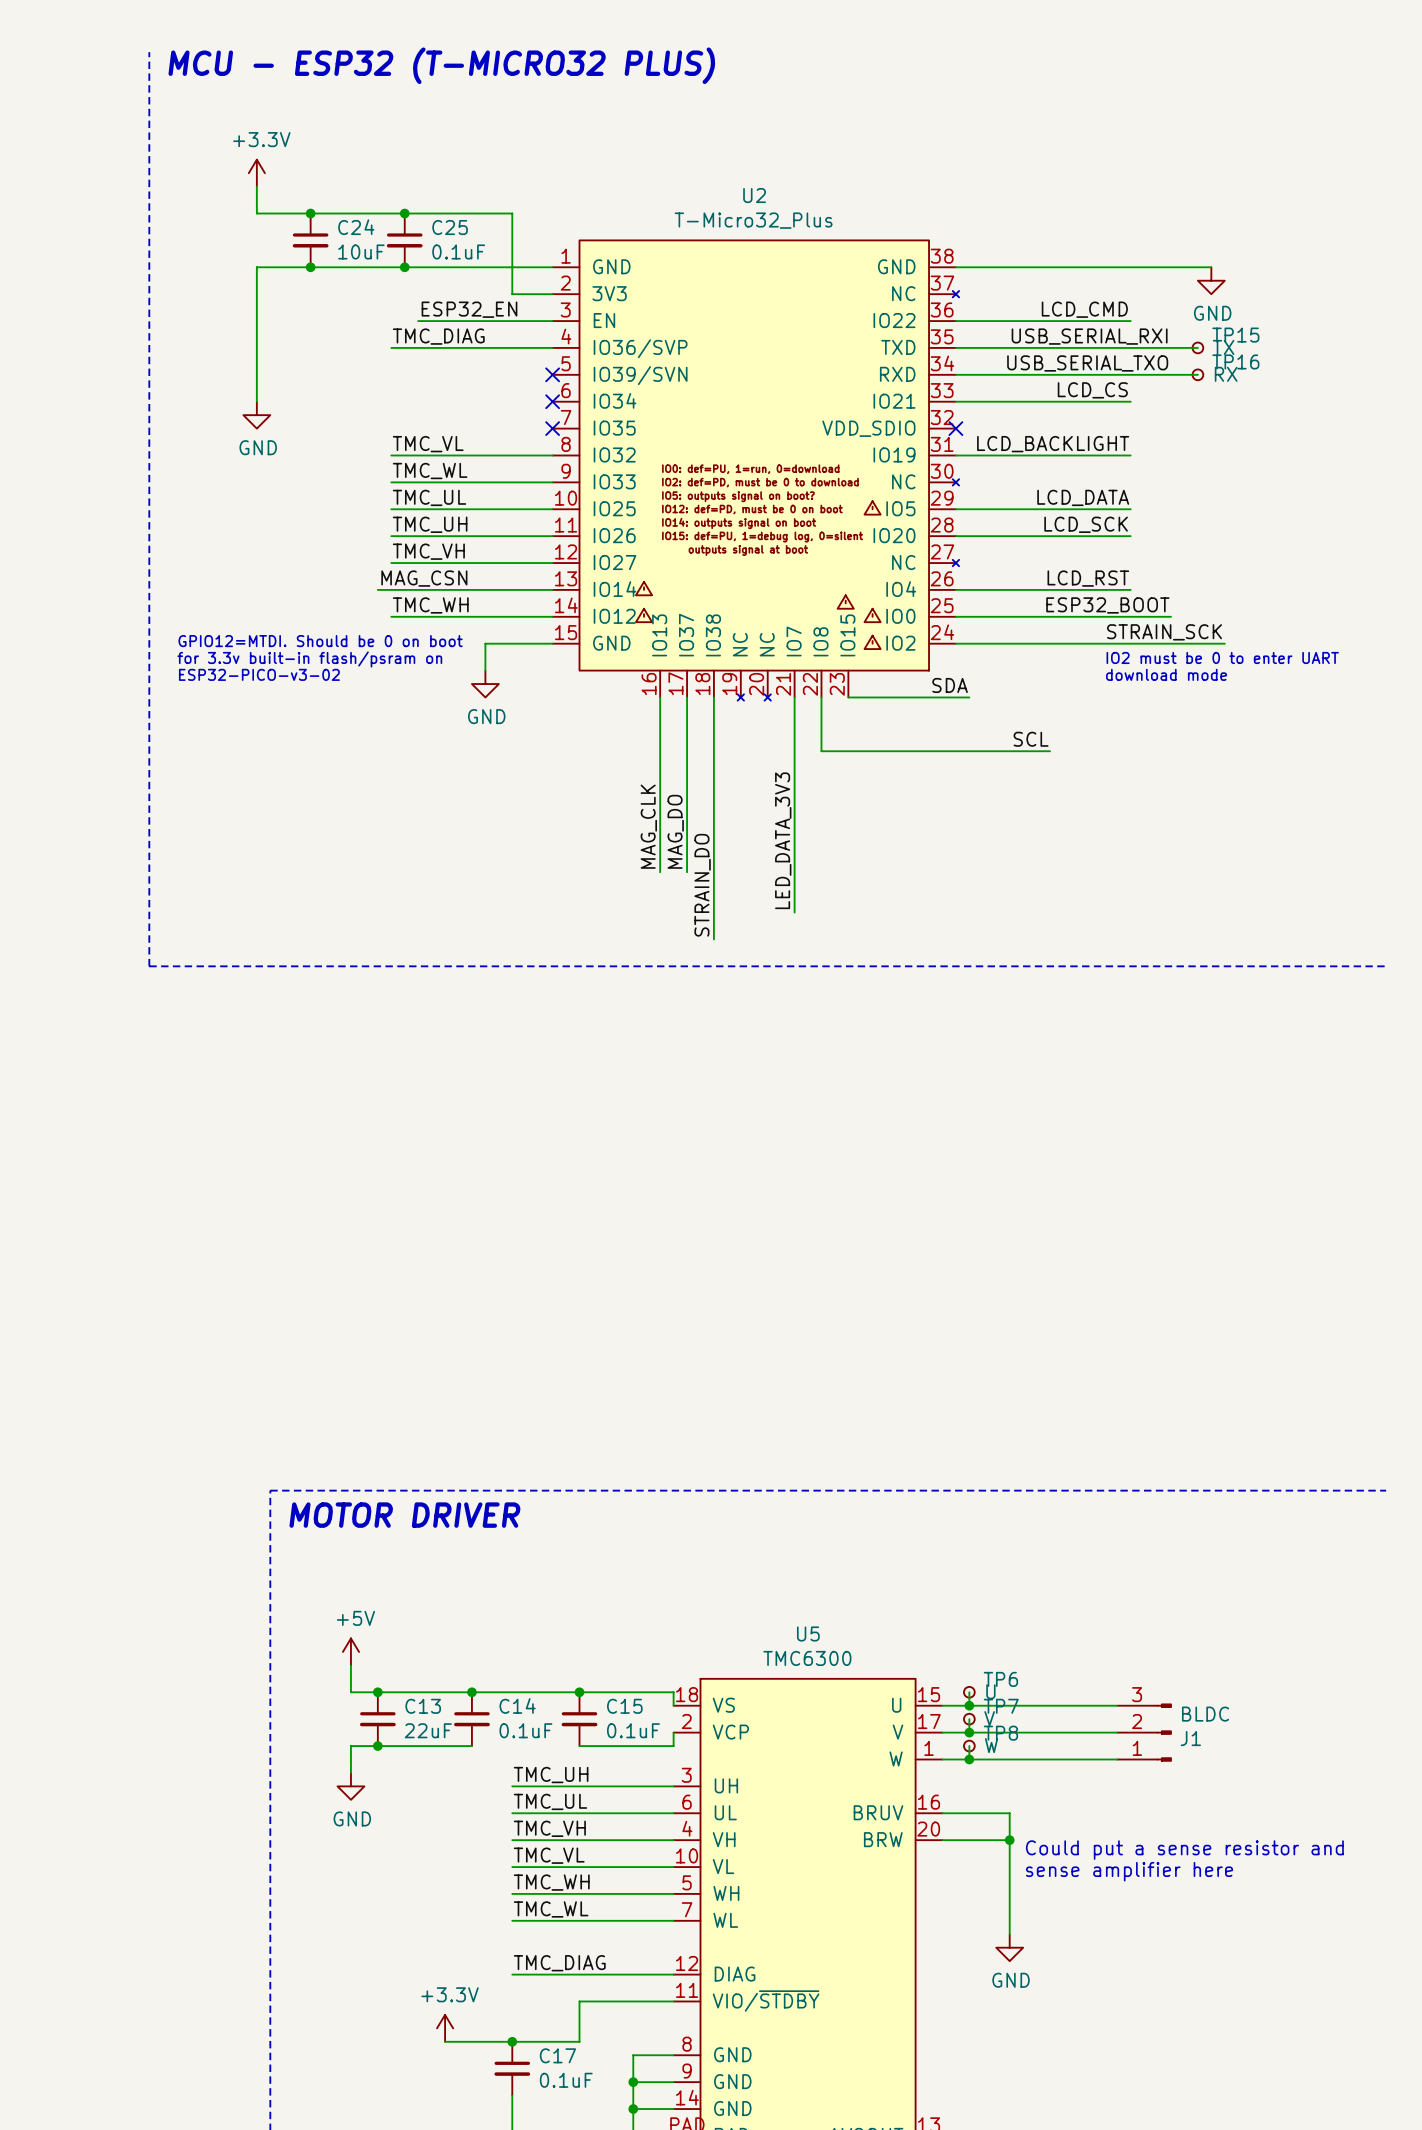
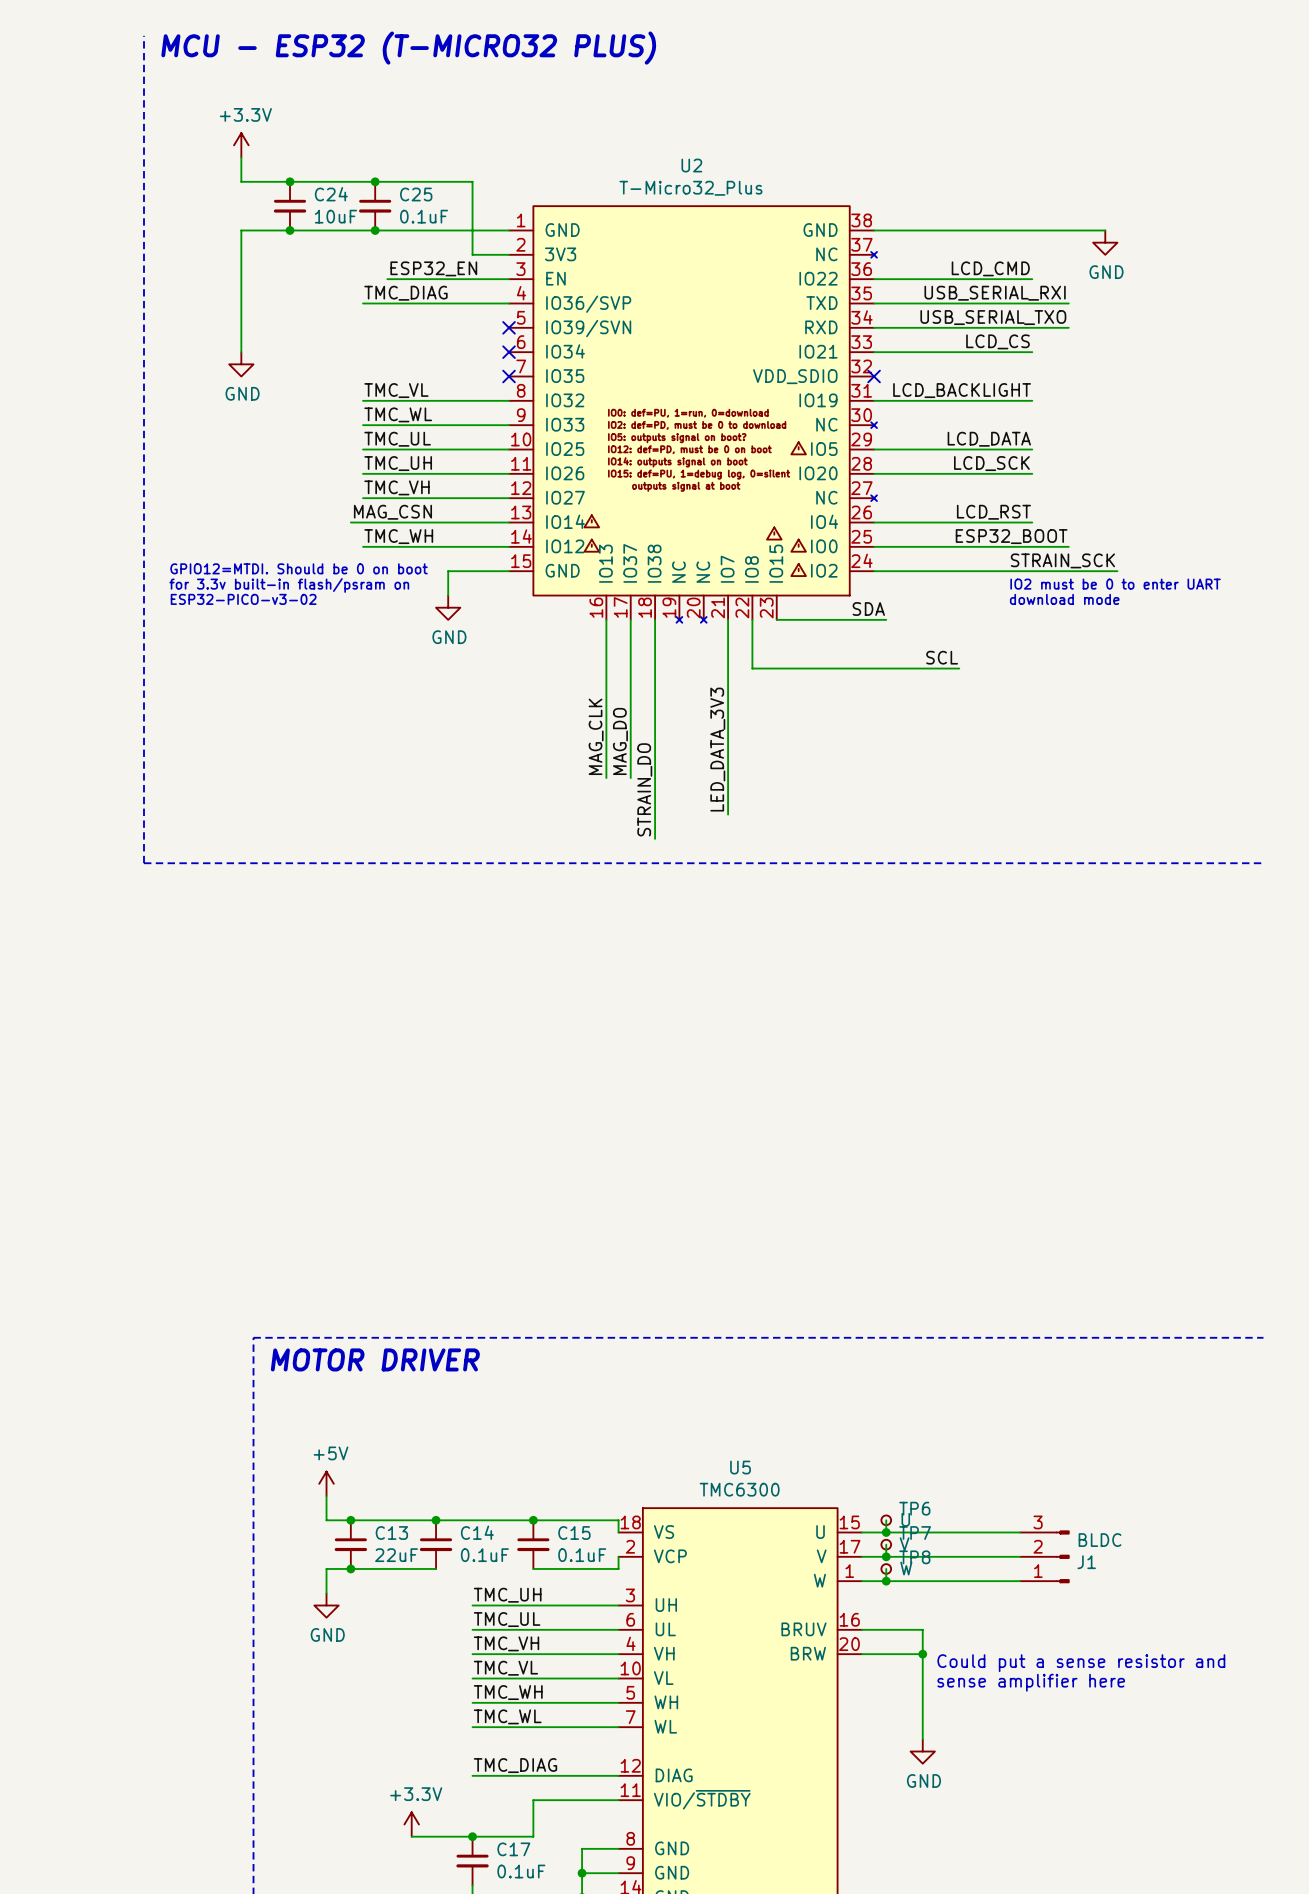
wire: (1171, 347) (1197, 347) -> none
TP15: TX (1197, 347) -> none
wire: (1171, 374) (1197, 374) -> none
TP16: RX (1197, 374) -> none

